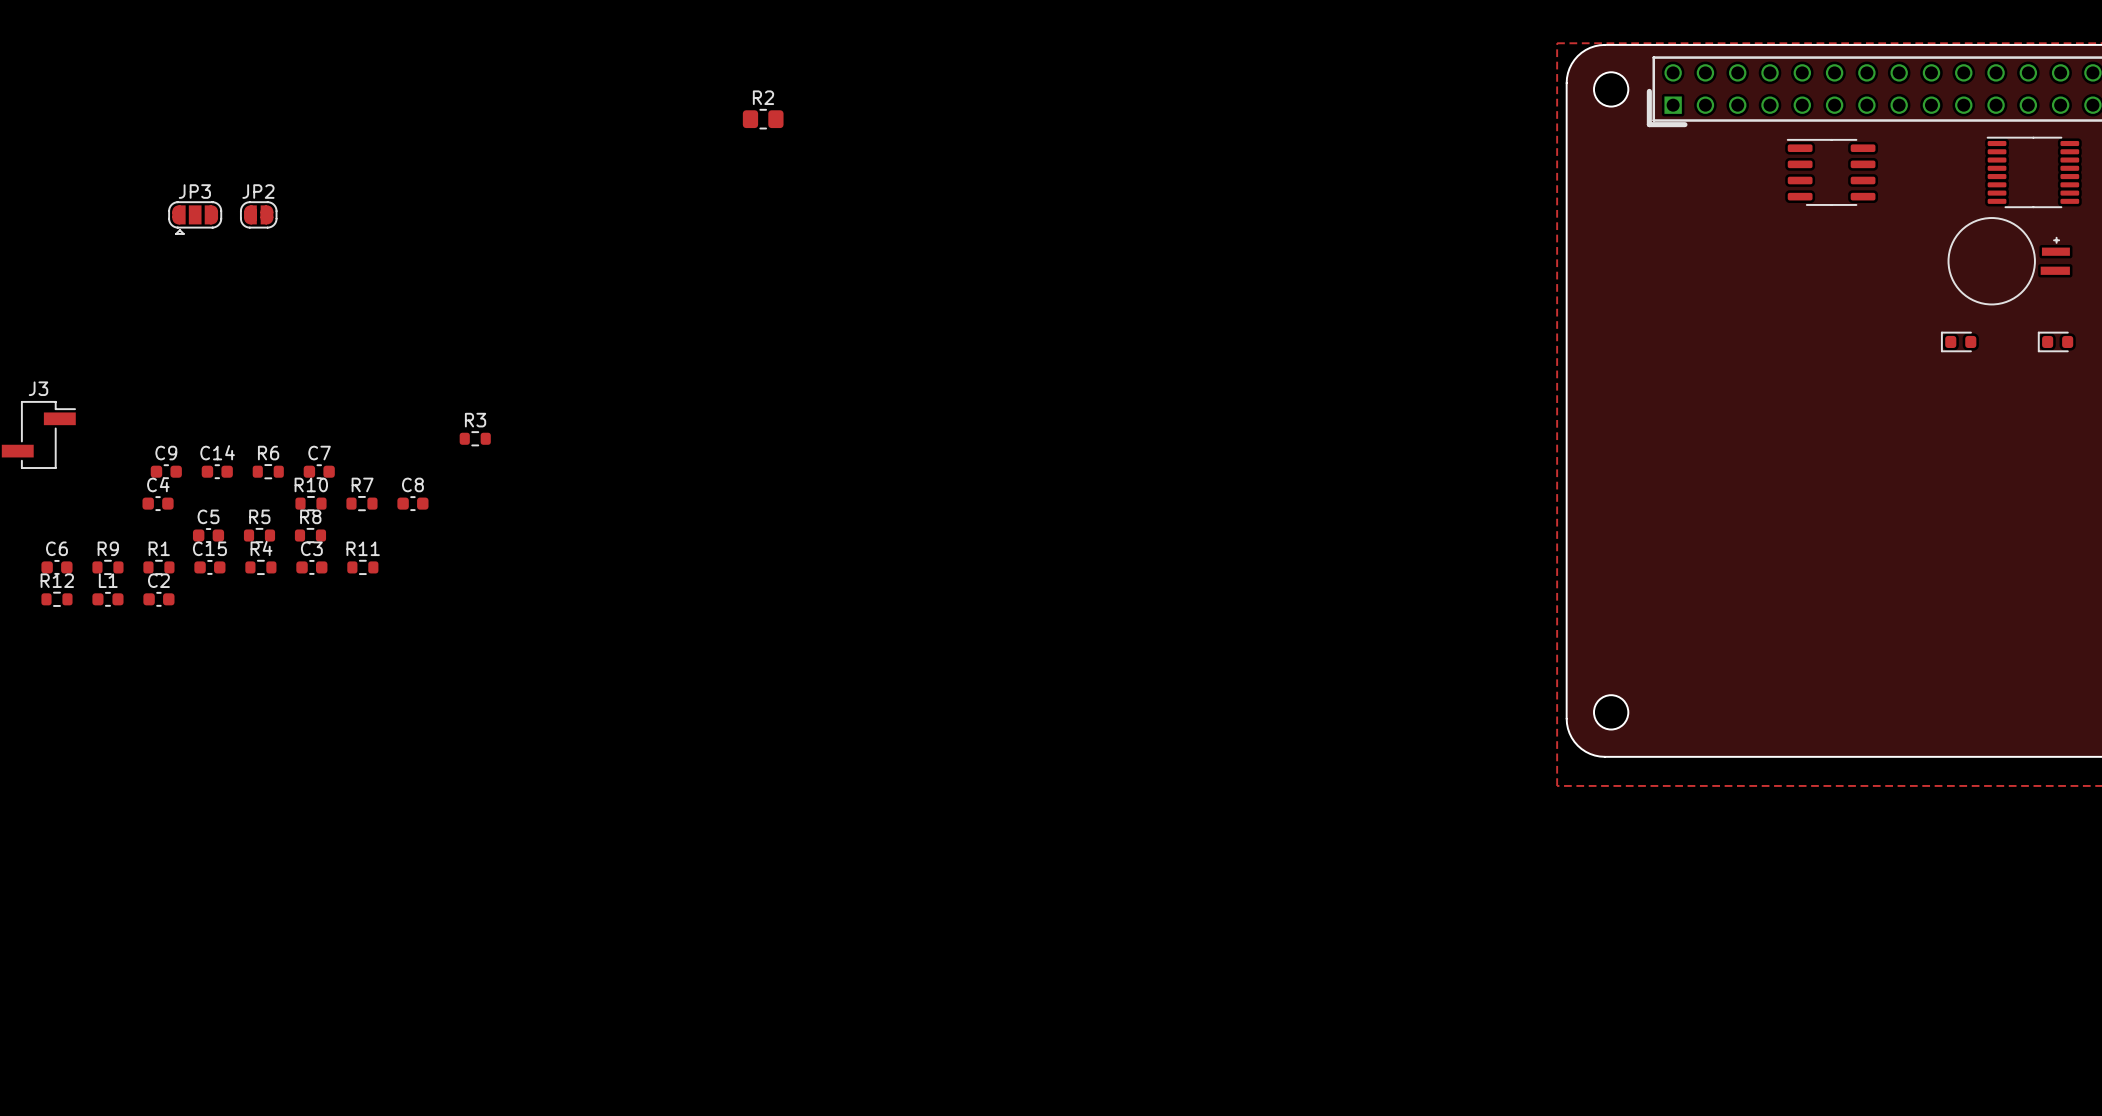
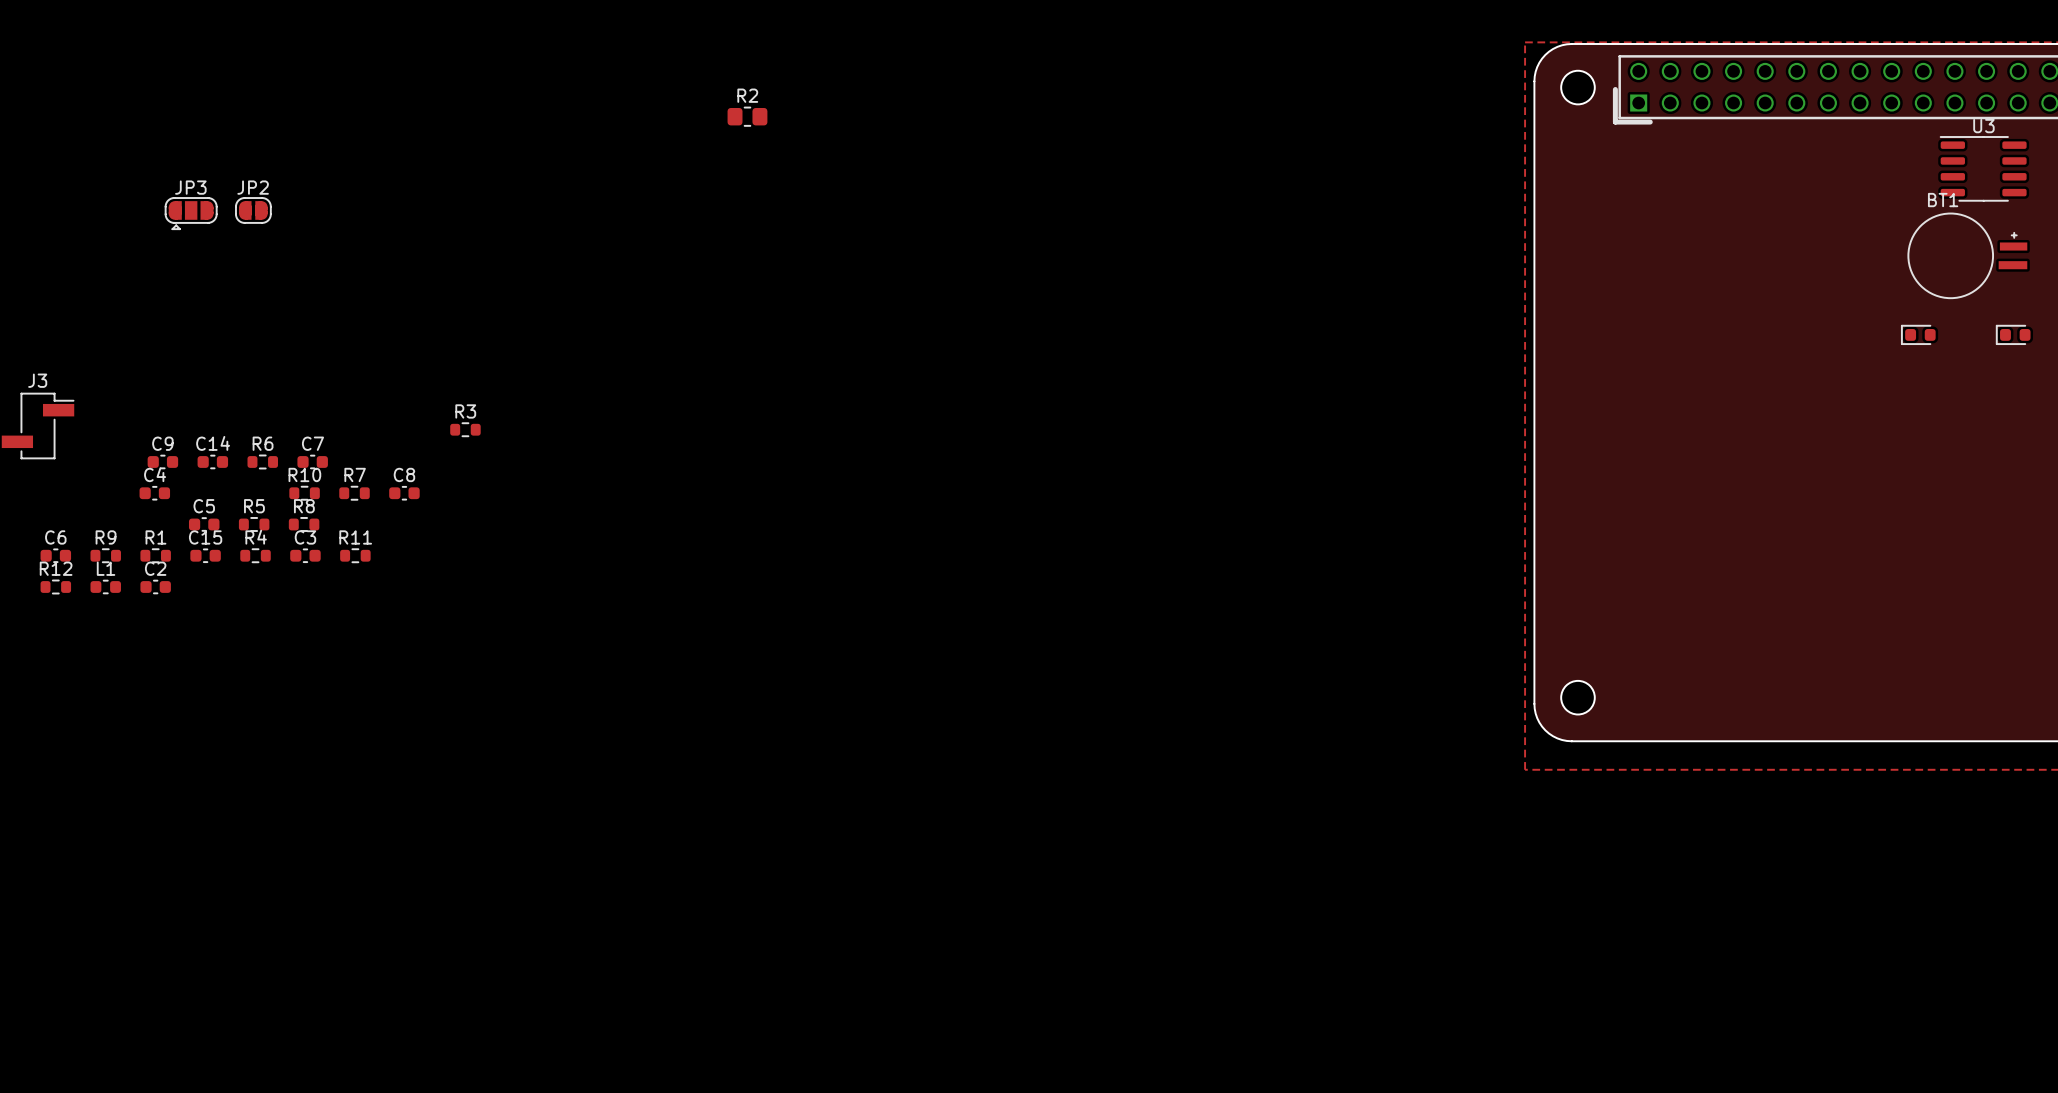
part: (1831, 172) -> none
U3: none -> (1983, 168)
part: (2033, 172) -> none
BT1 name: none -> BT1 (1943, 200)

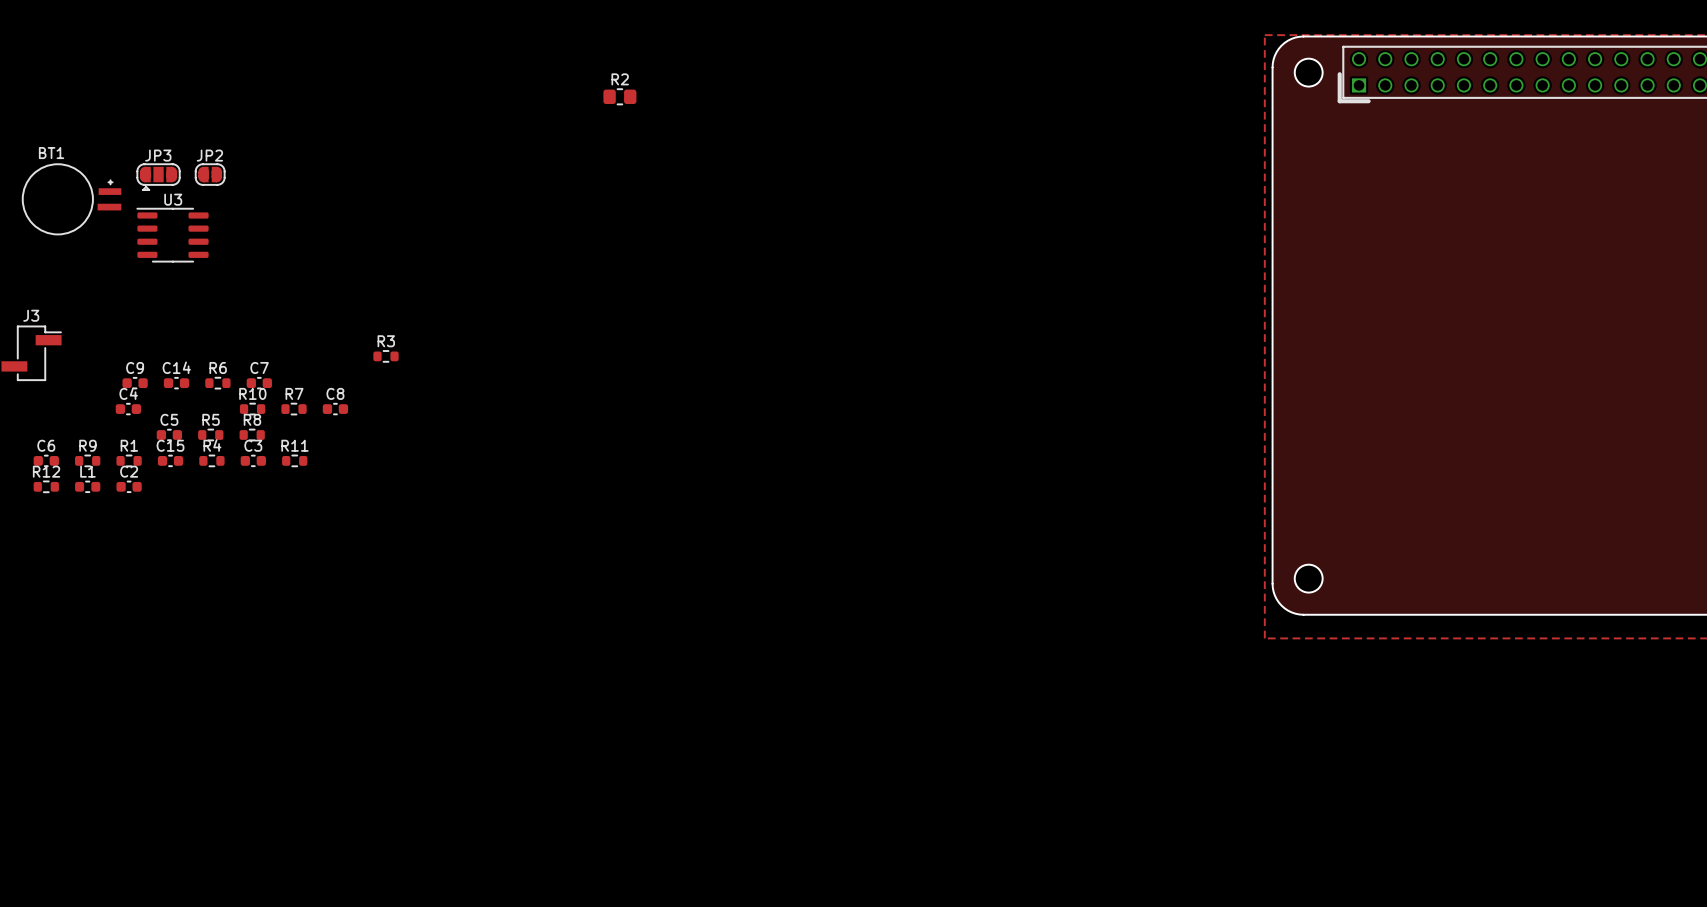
U3 position: (1983, 168) -> (172, 235)
BT1 position: (1967, 255) -> (71, 199)
part: (1918, 334) -> none
part: (2013, 334) -> none

